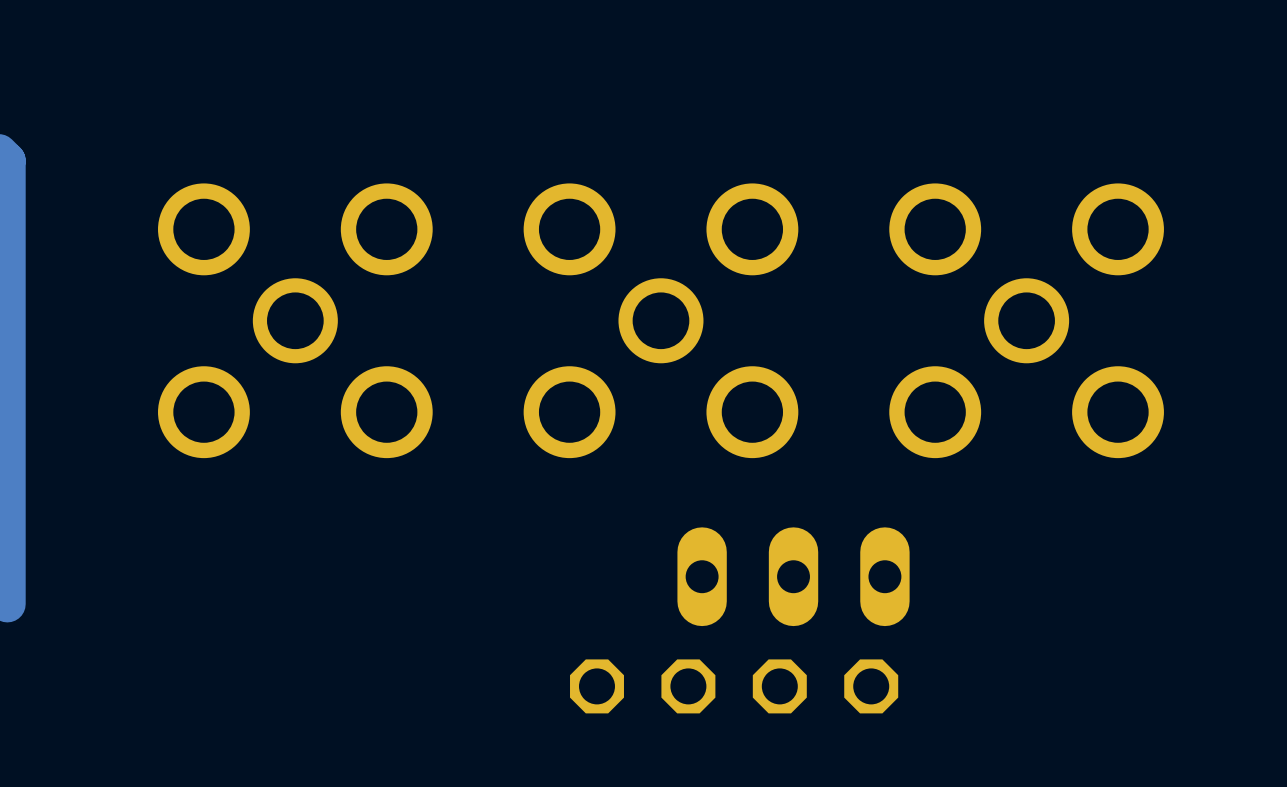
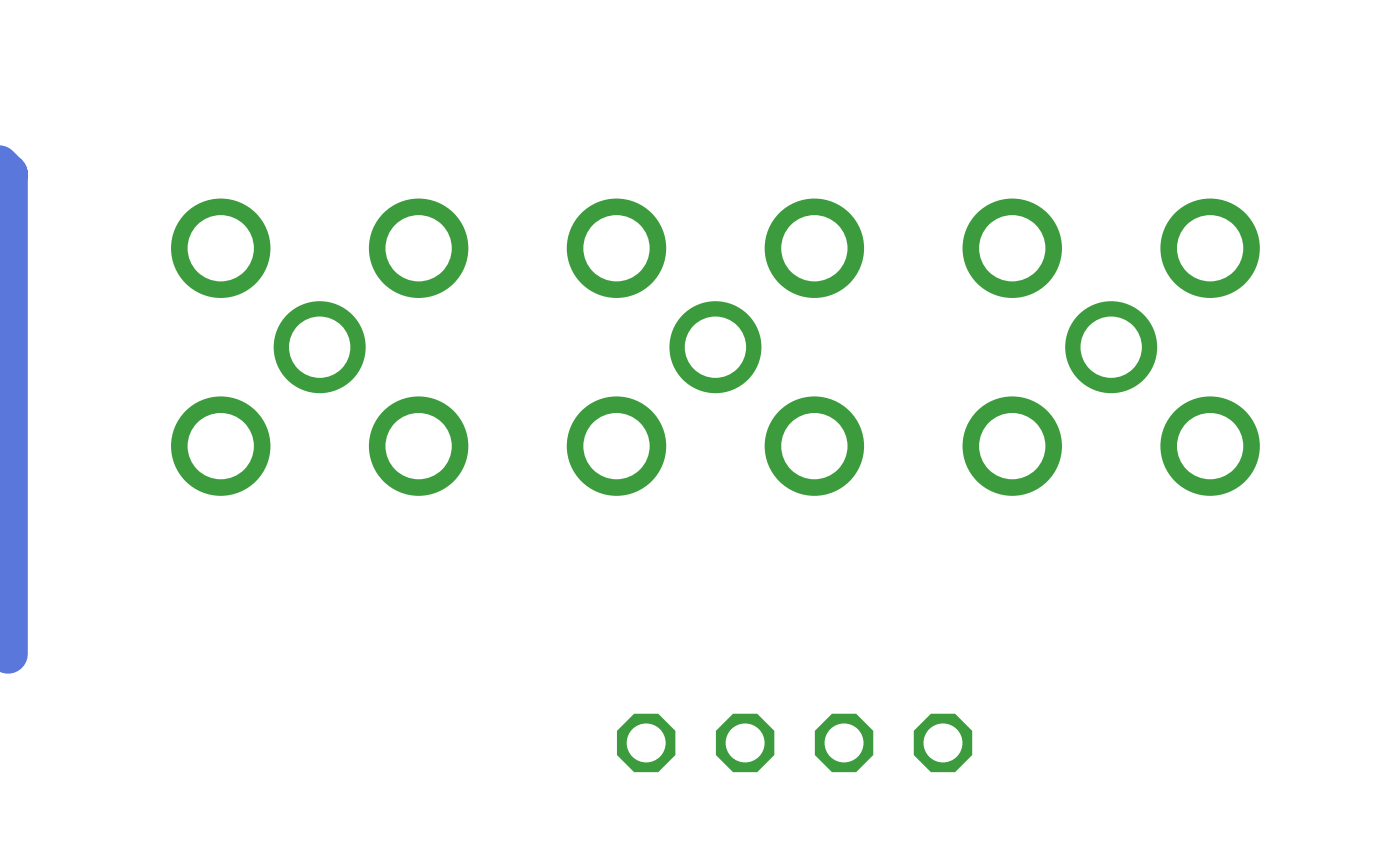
part: (793, 576) -> none

